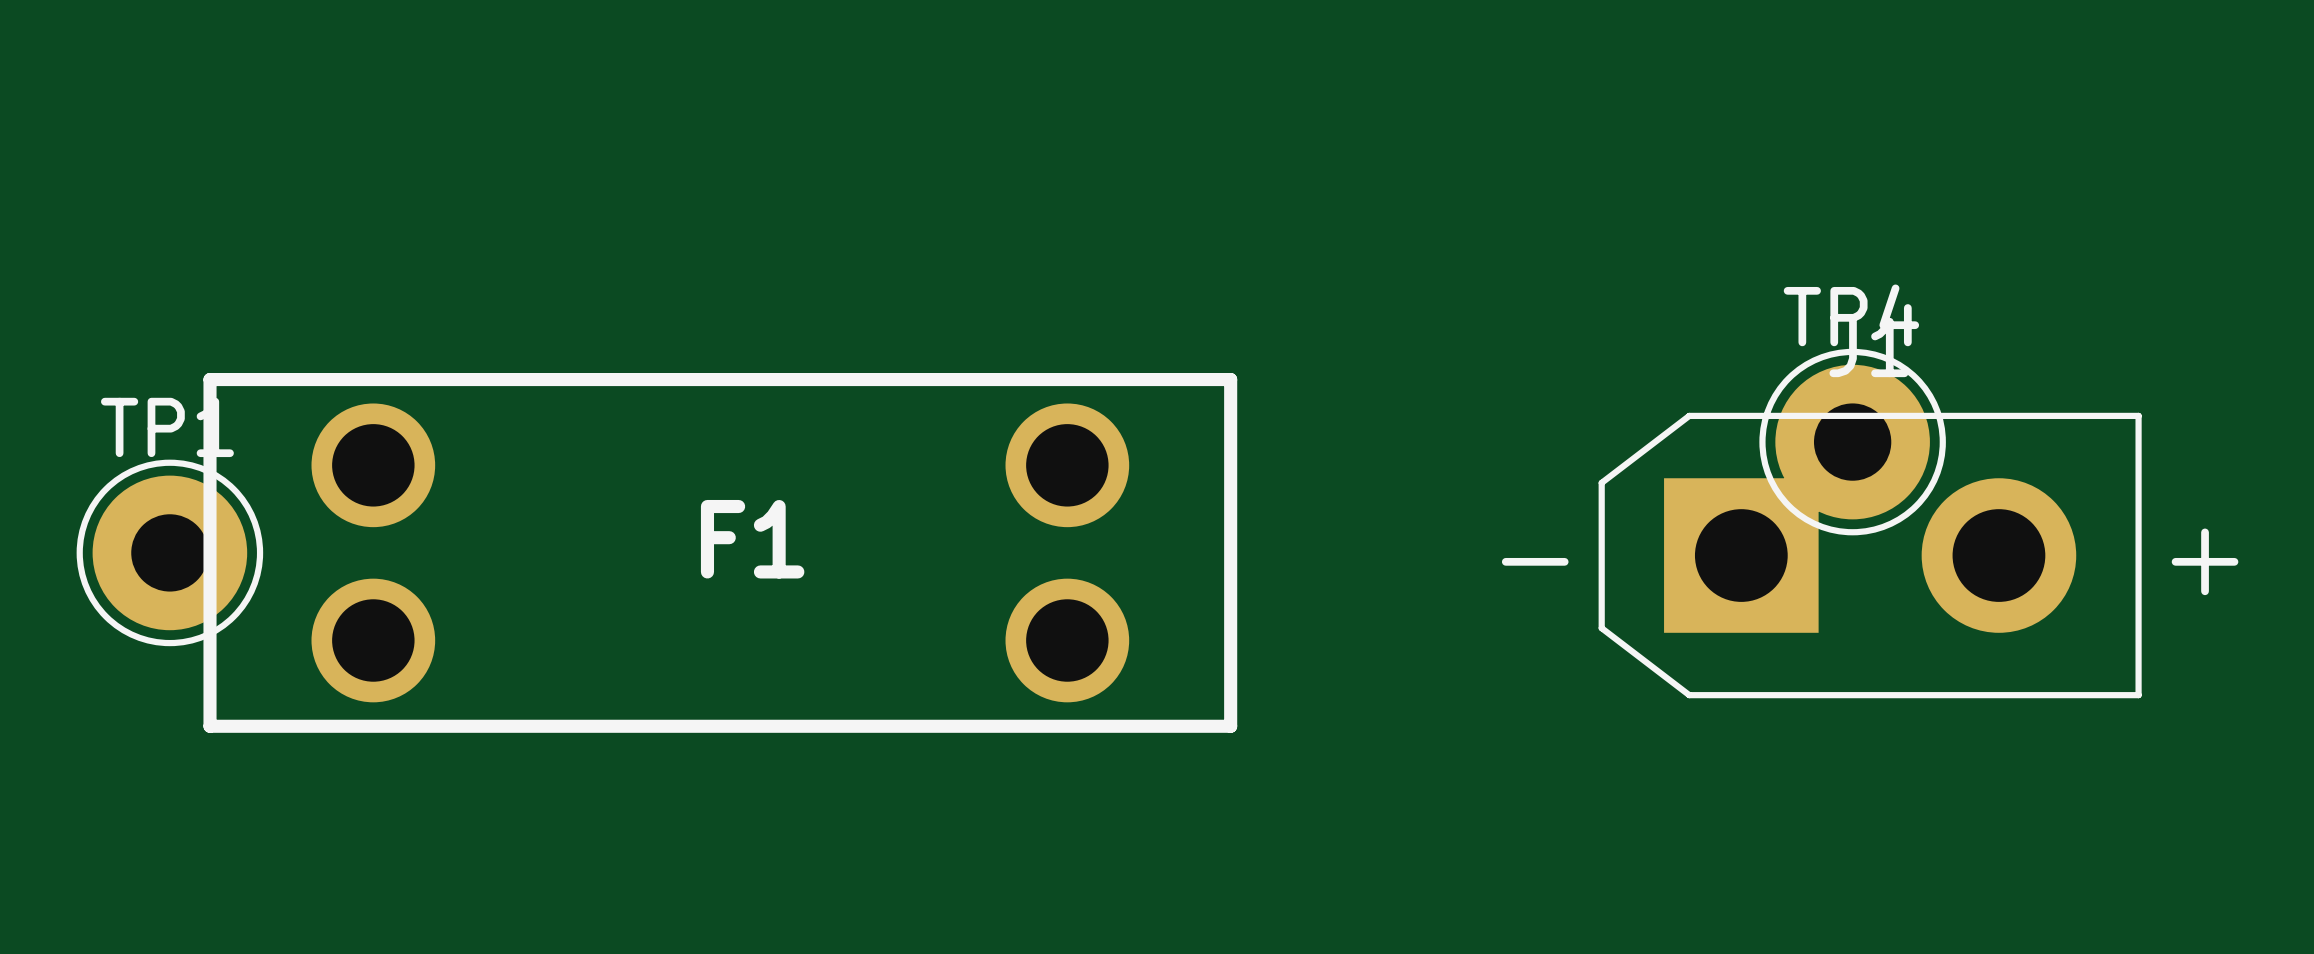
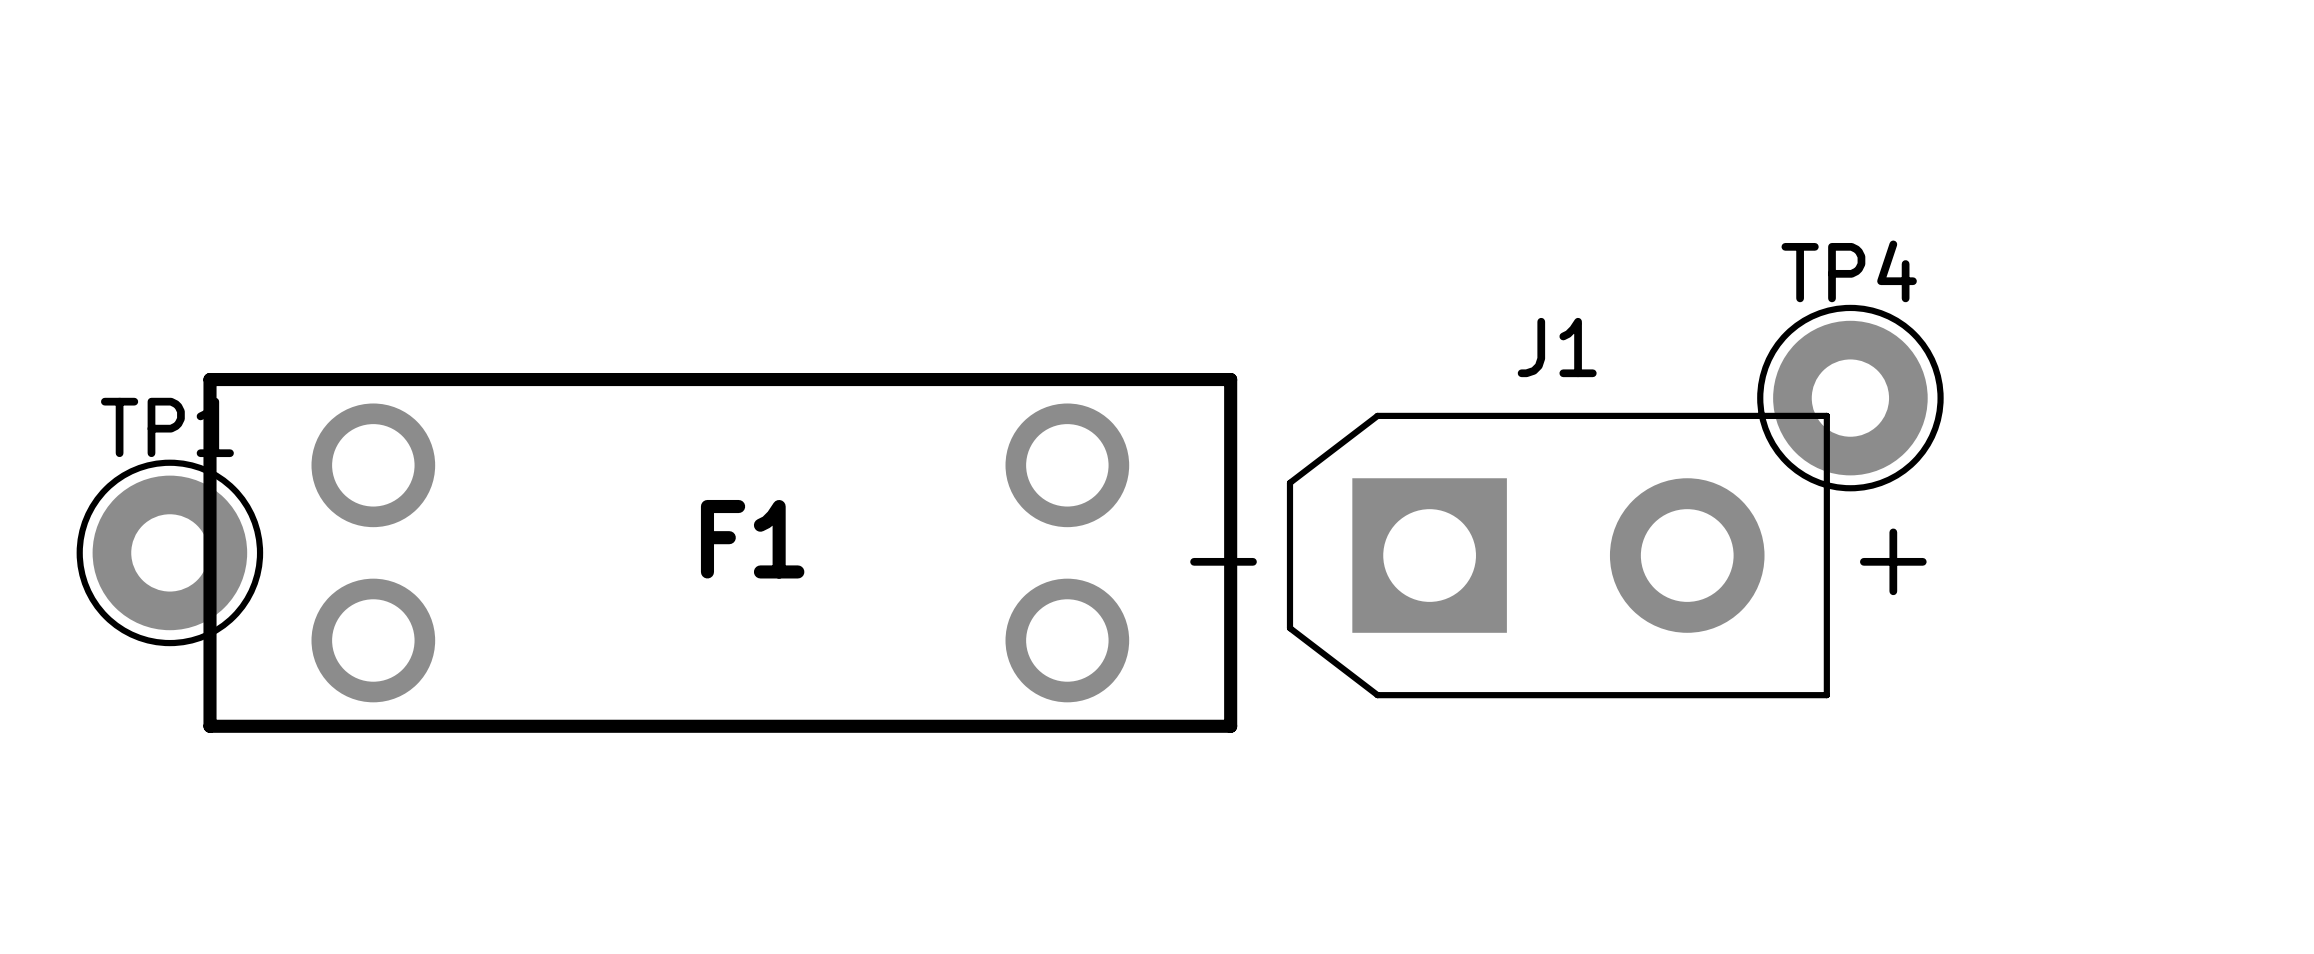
TP4 position: (1852, 442) -> (1850, 398)
J1 position: (1870, 555) -> (1558, 555)

